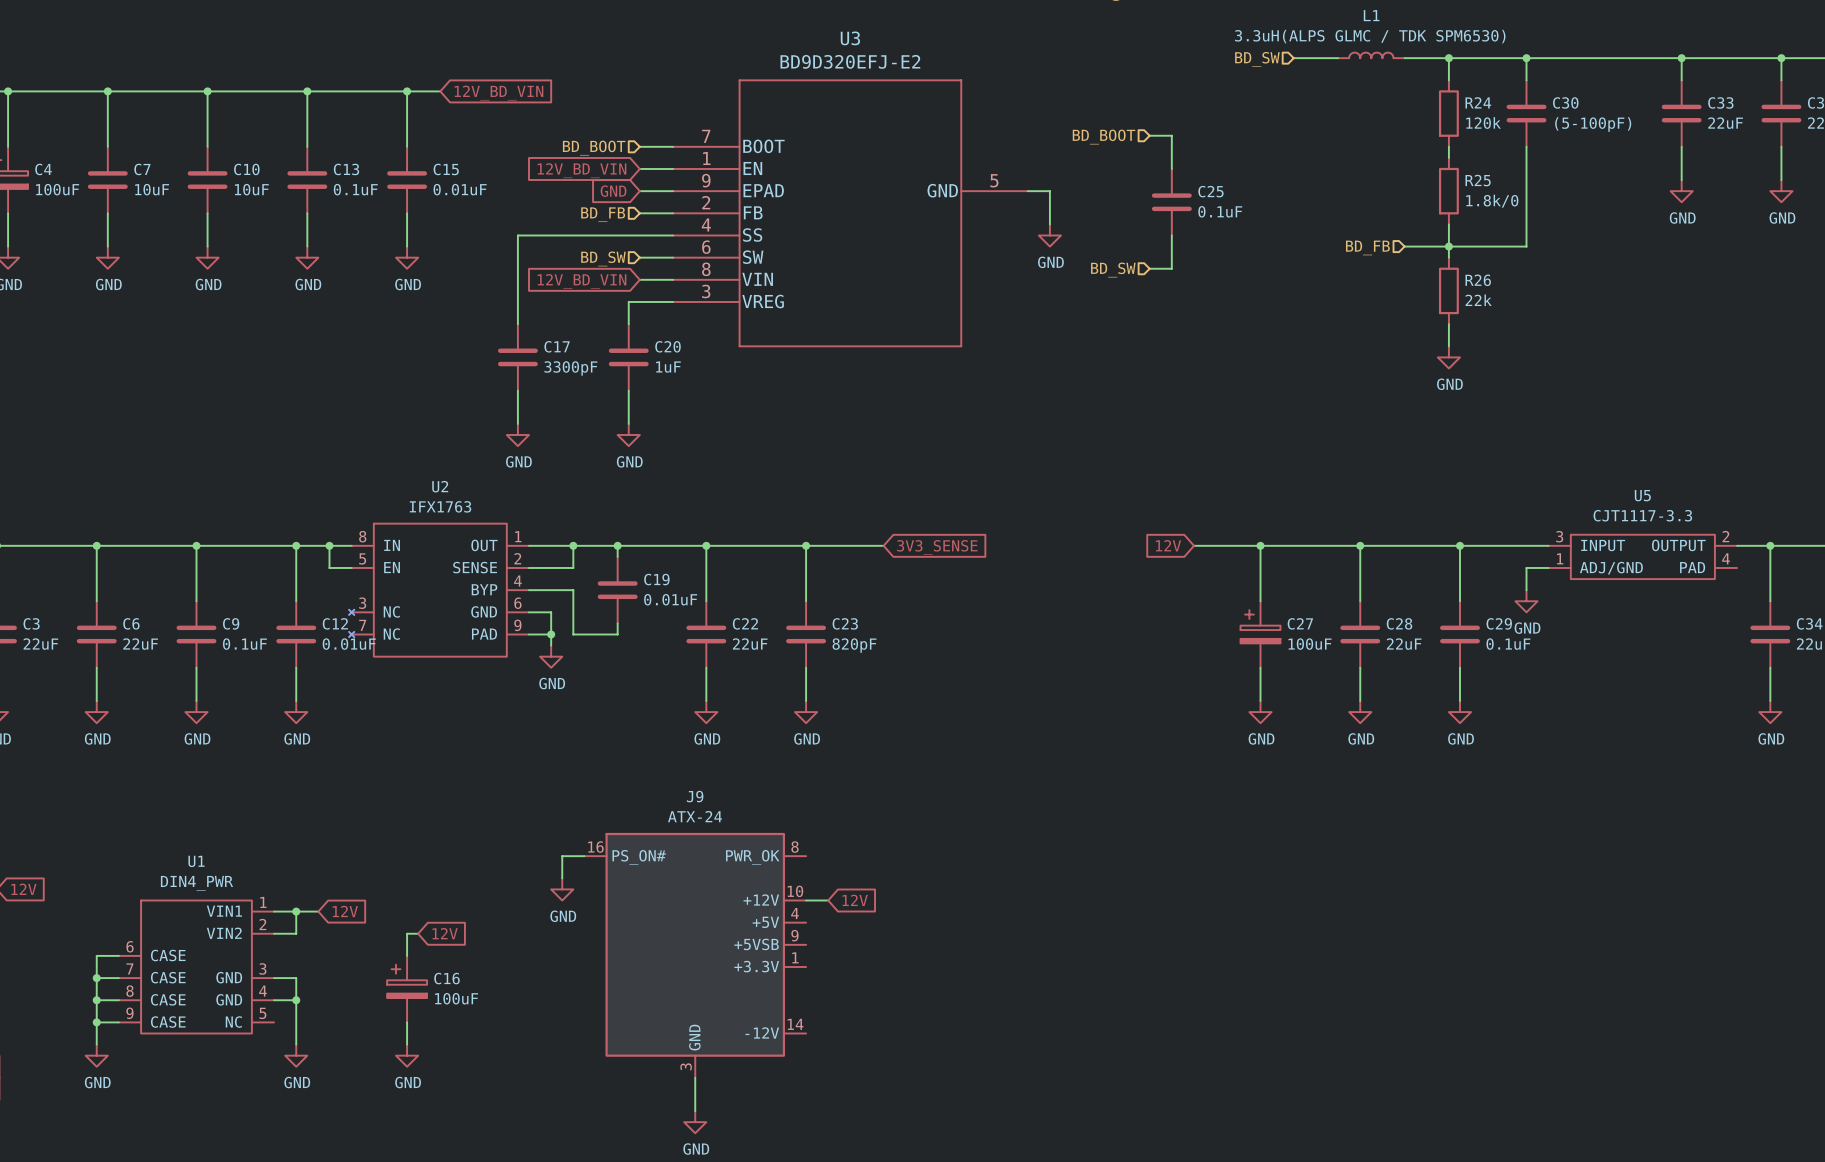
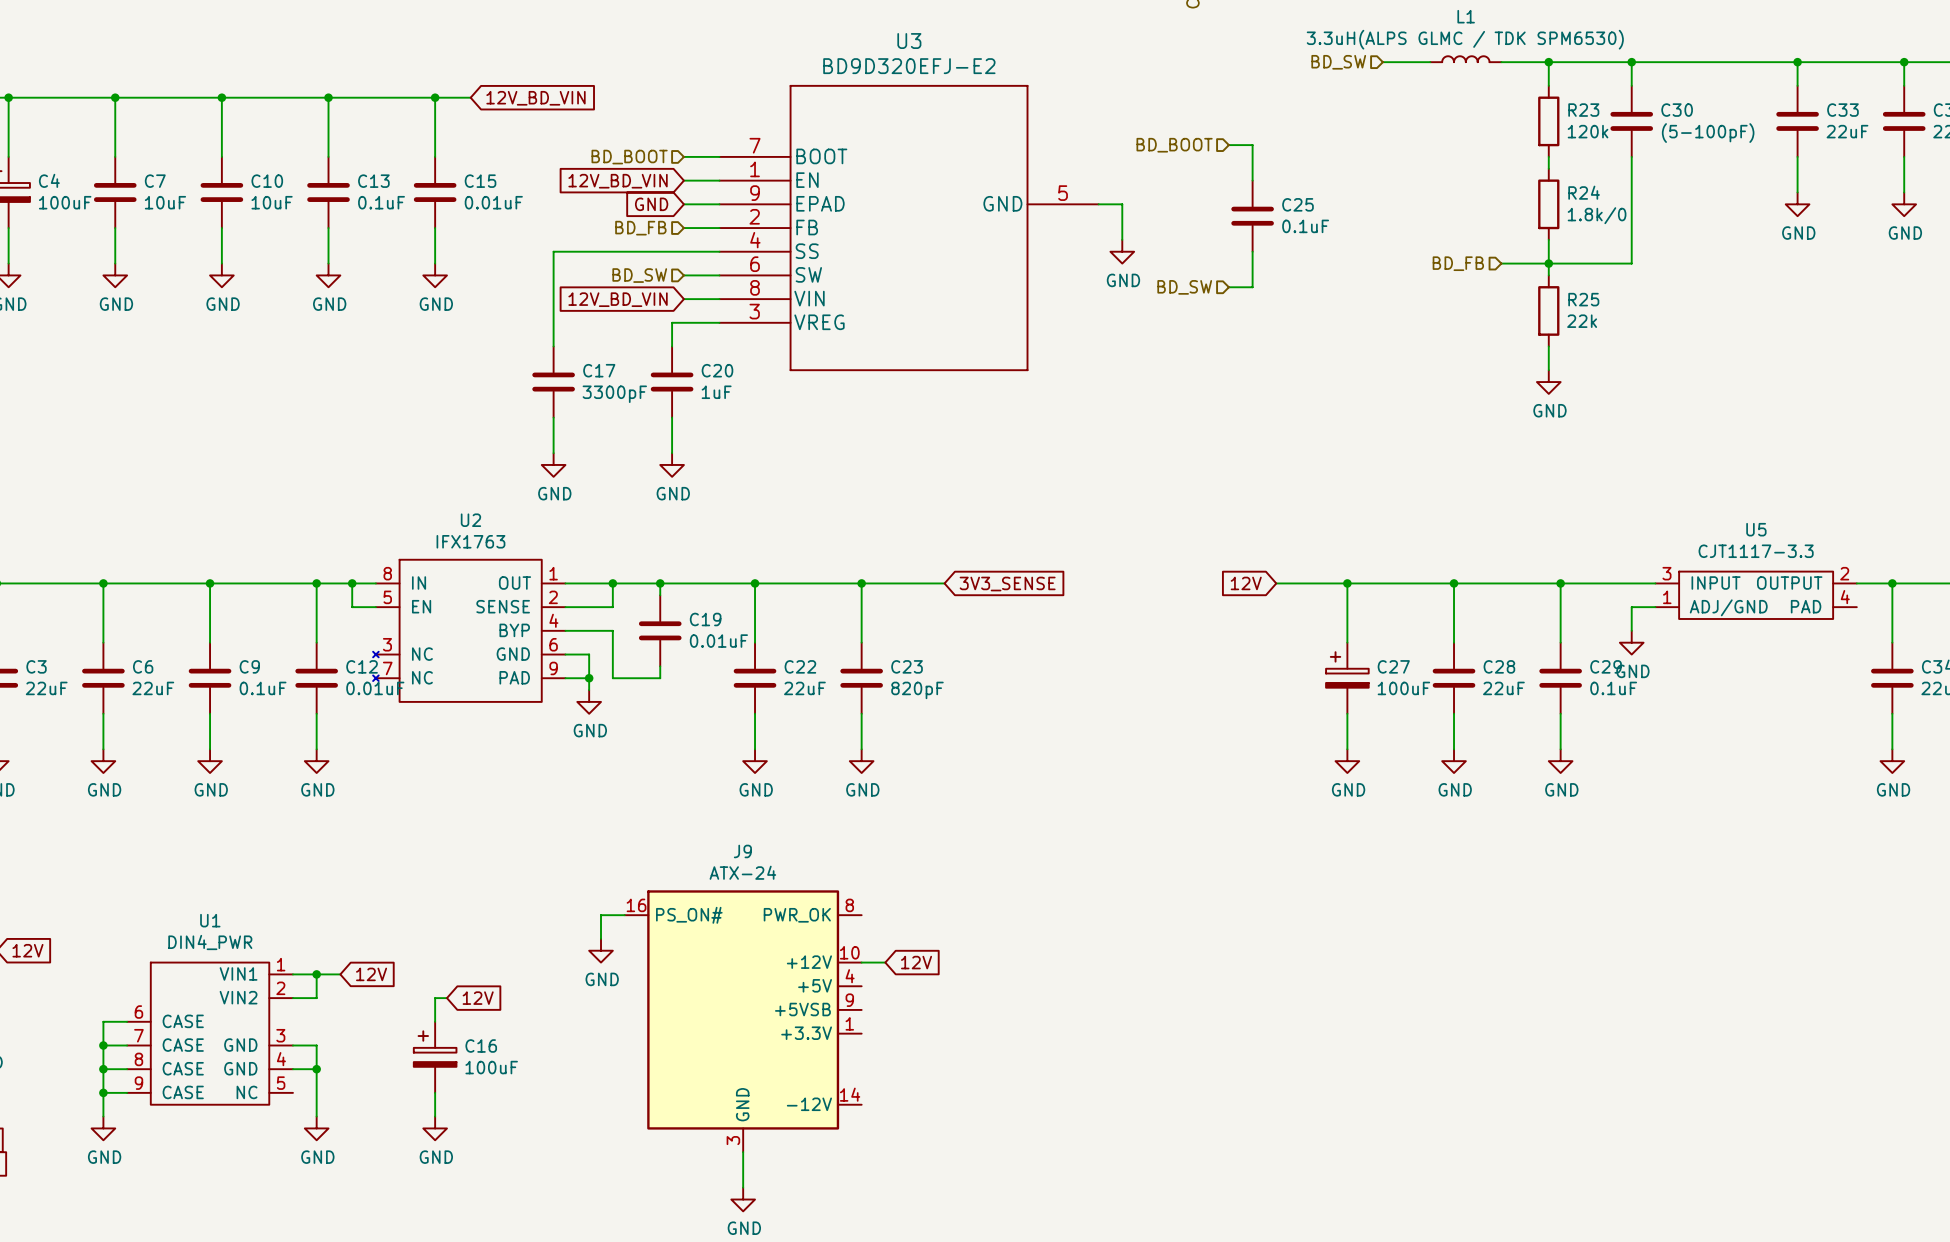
R24 name: R24 (1478, 102) -> R23 (1583, 110)
R25 name: R25 (1478, 180) -> R24 (1584, 192)
R26 name: R26 (1478, 280) -> R25 (1583, 299)

